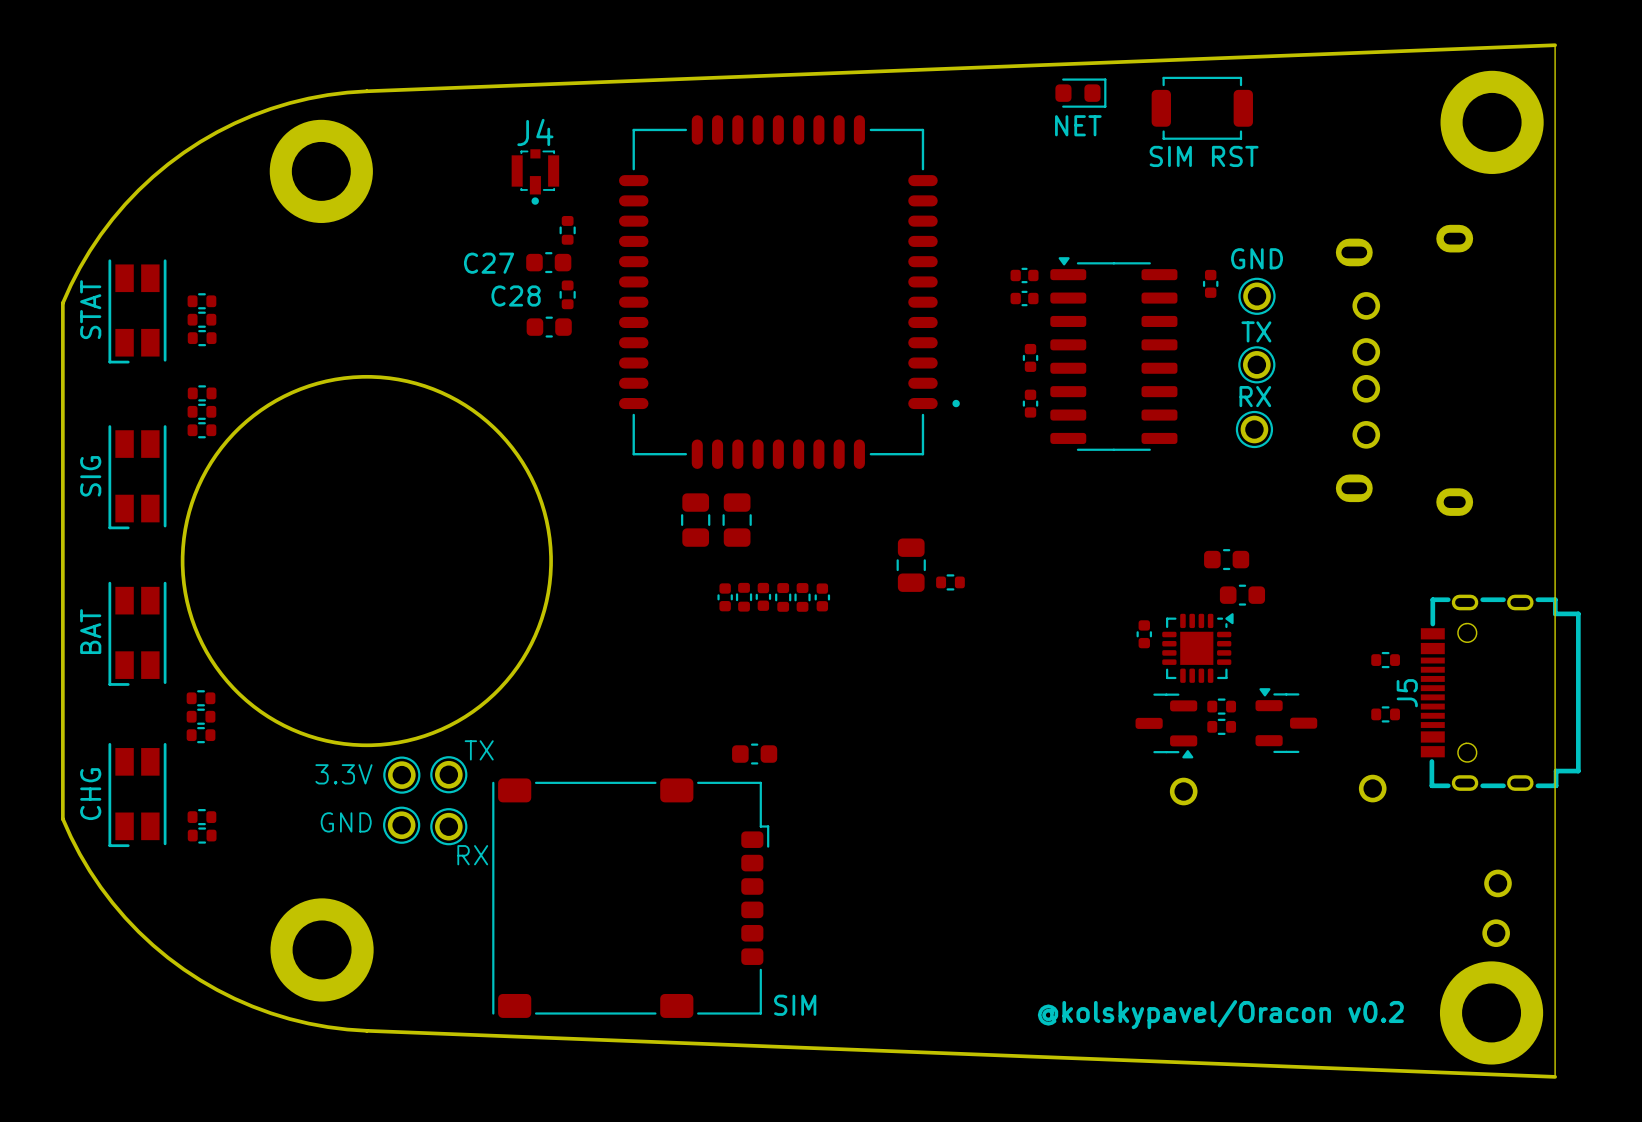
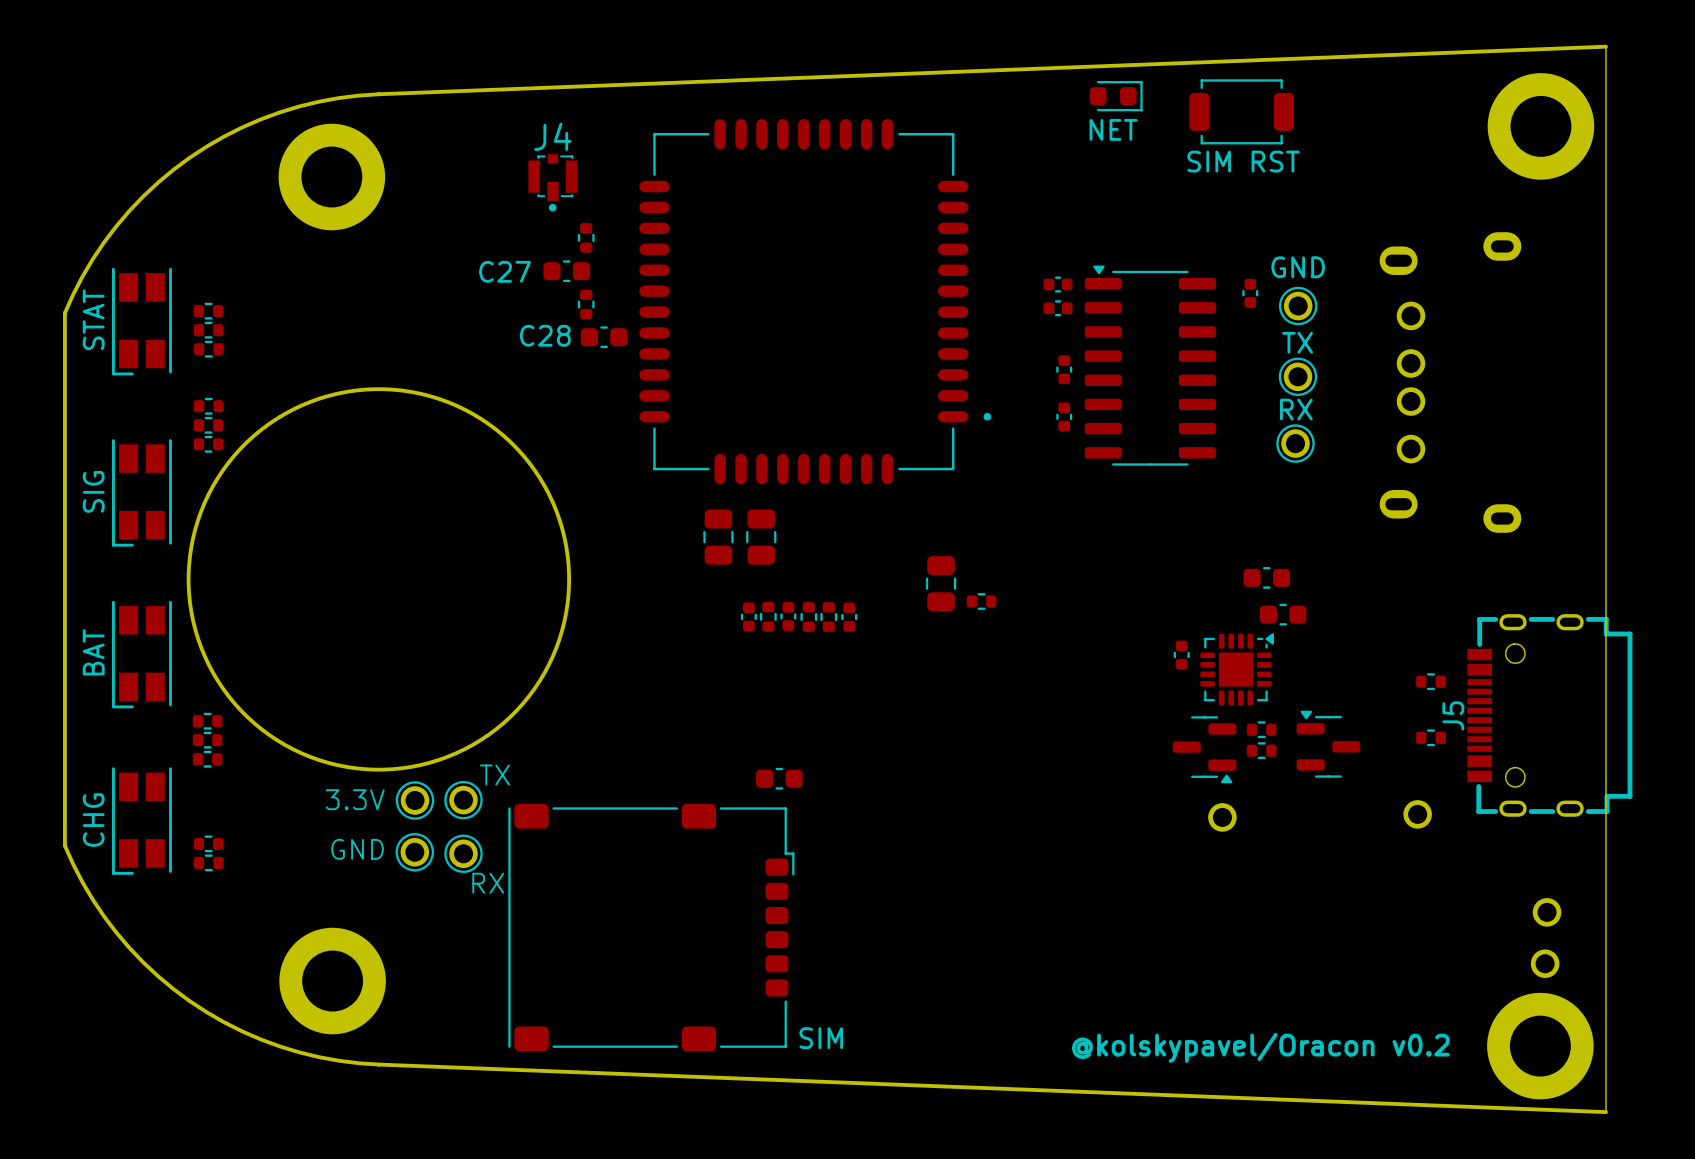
C28 name position: C28 (516, 295) -> C28 (545, 335)
C28 position: (549, 327) -> (604, 337)

